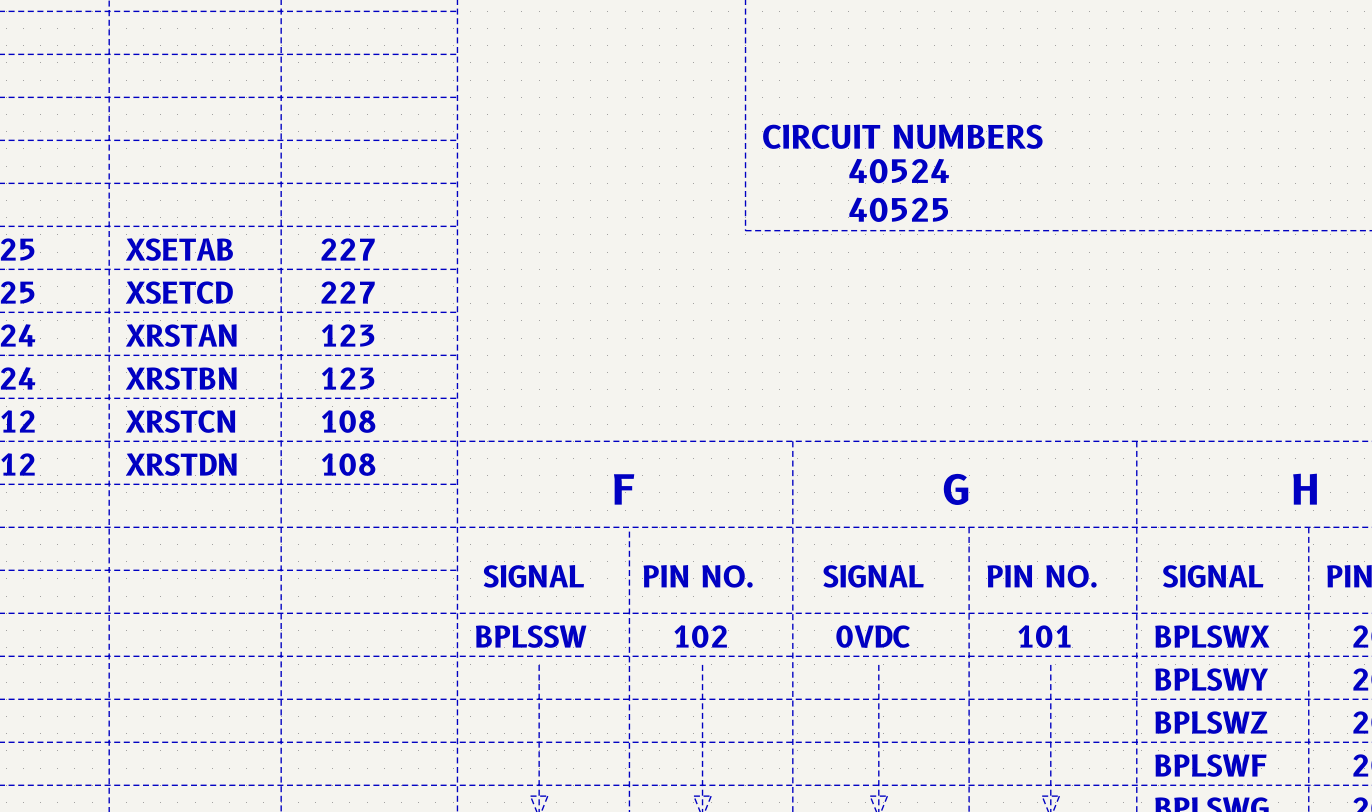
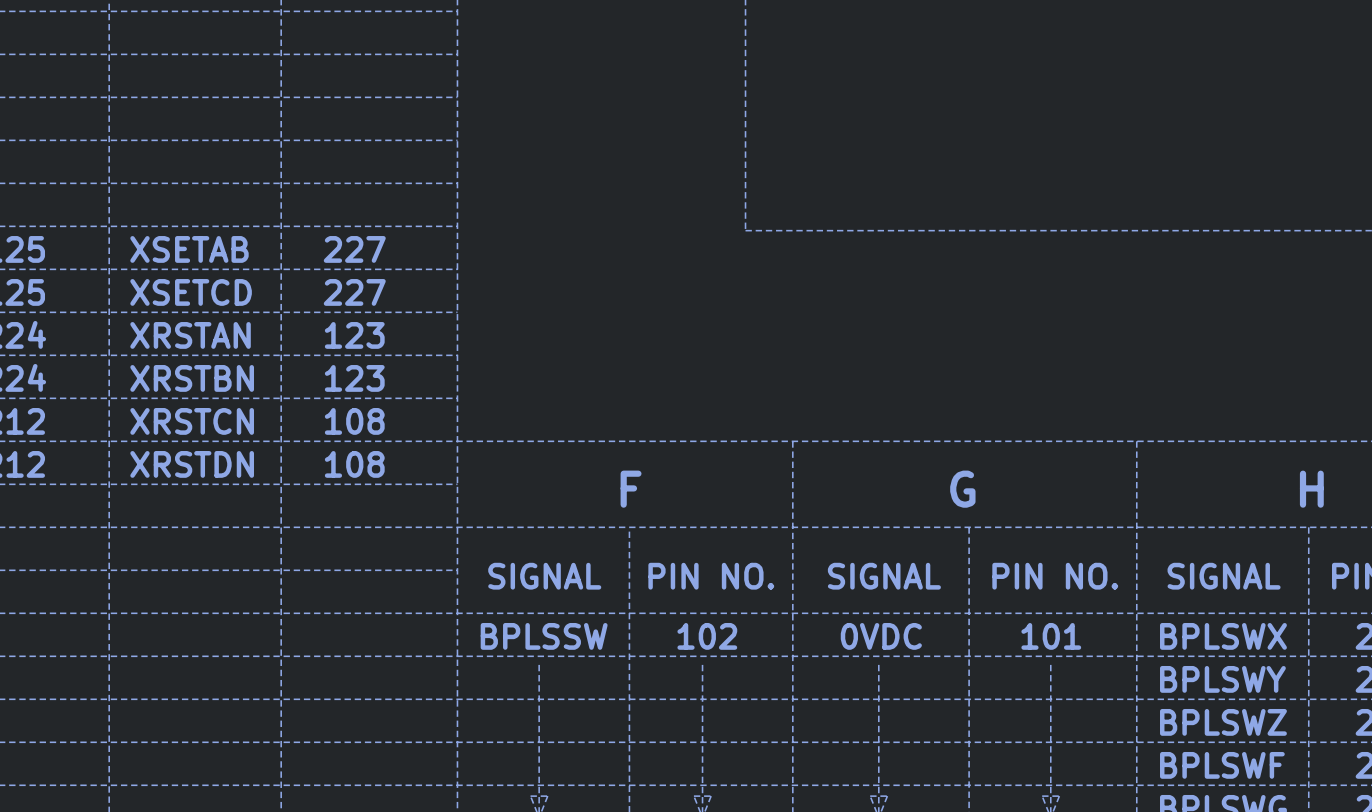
text: CIRCUIT NUMBERS (902, 136) -> none
text: 40524 (899, 171) -> none
text: 40525 (898, 209) -> none

